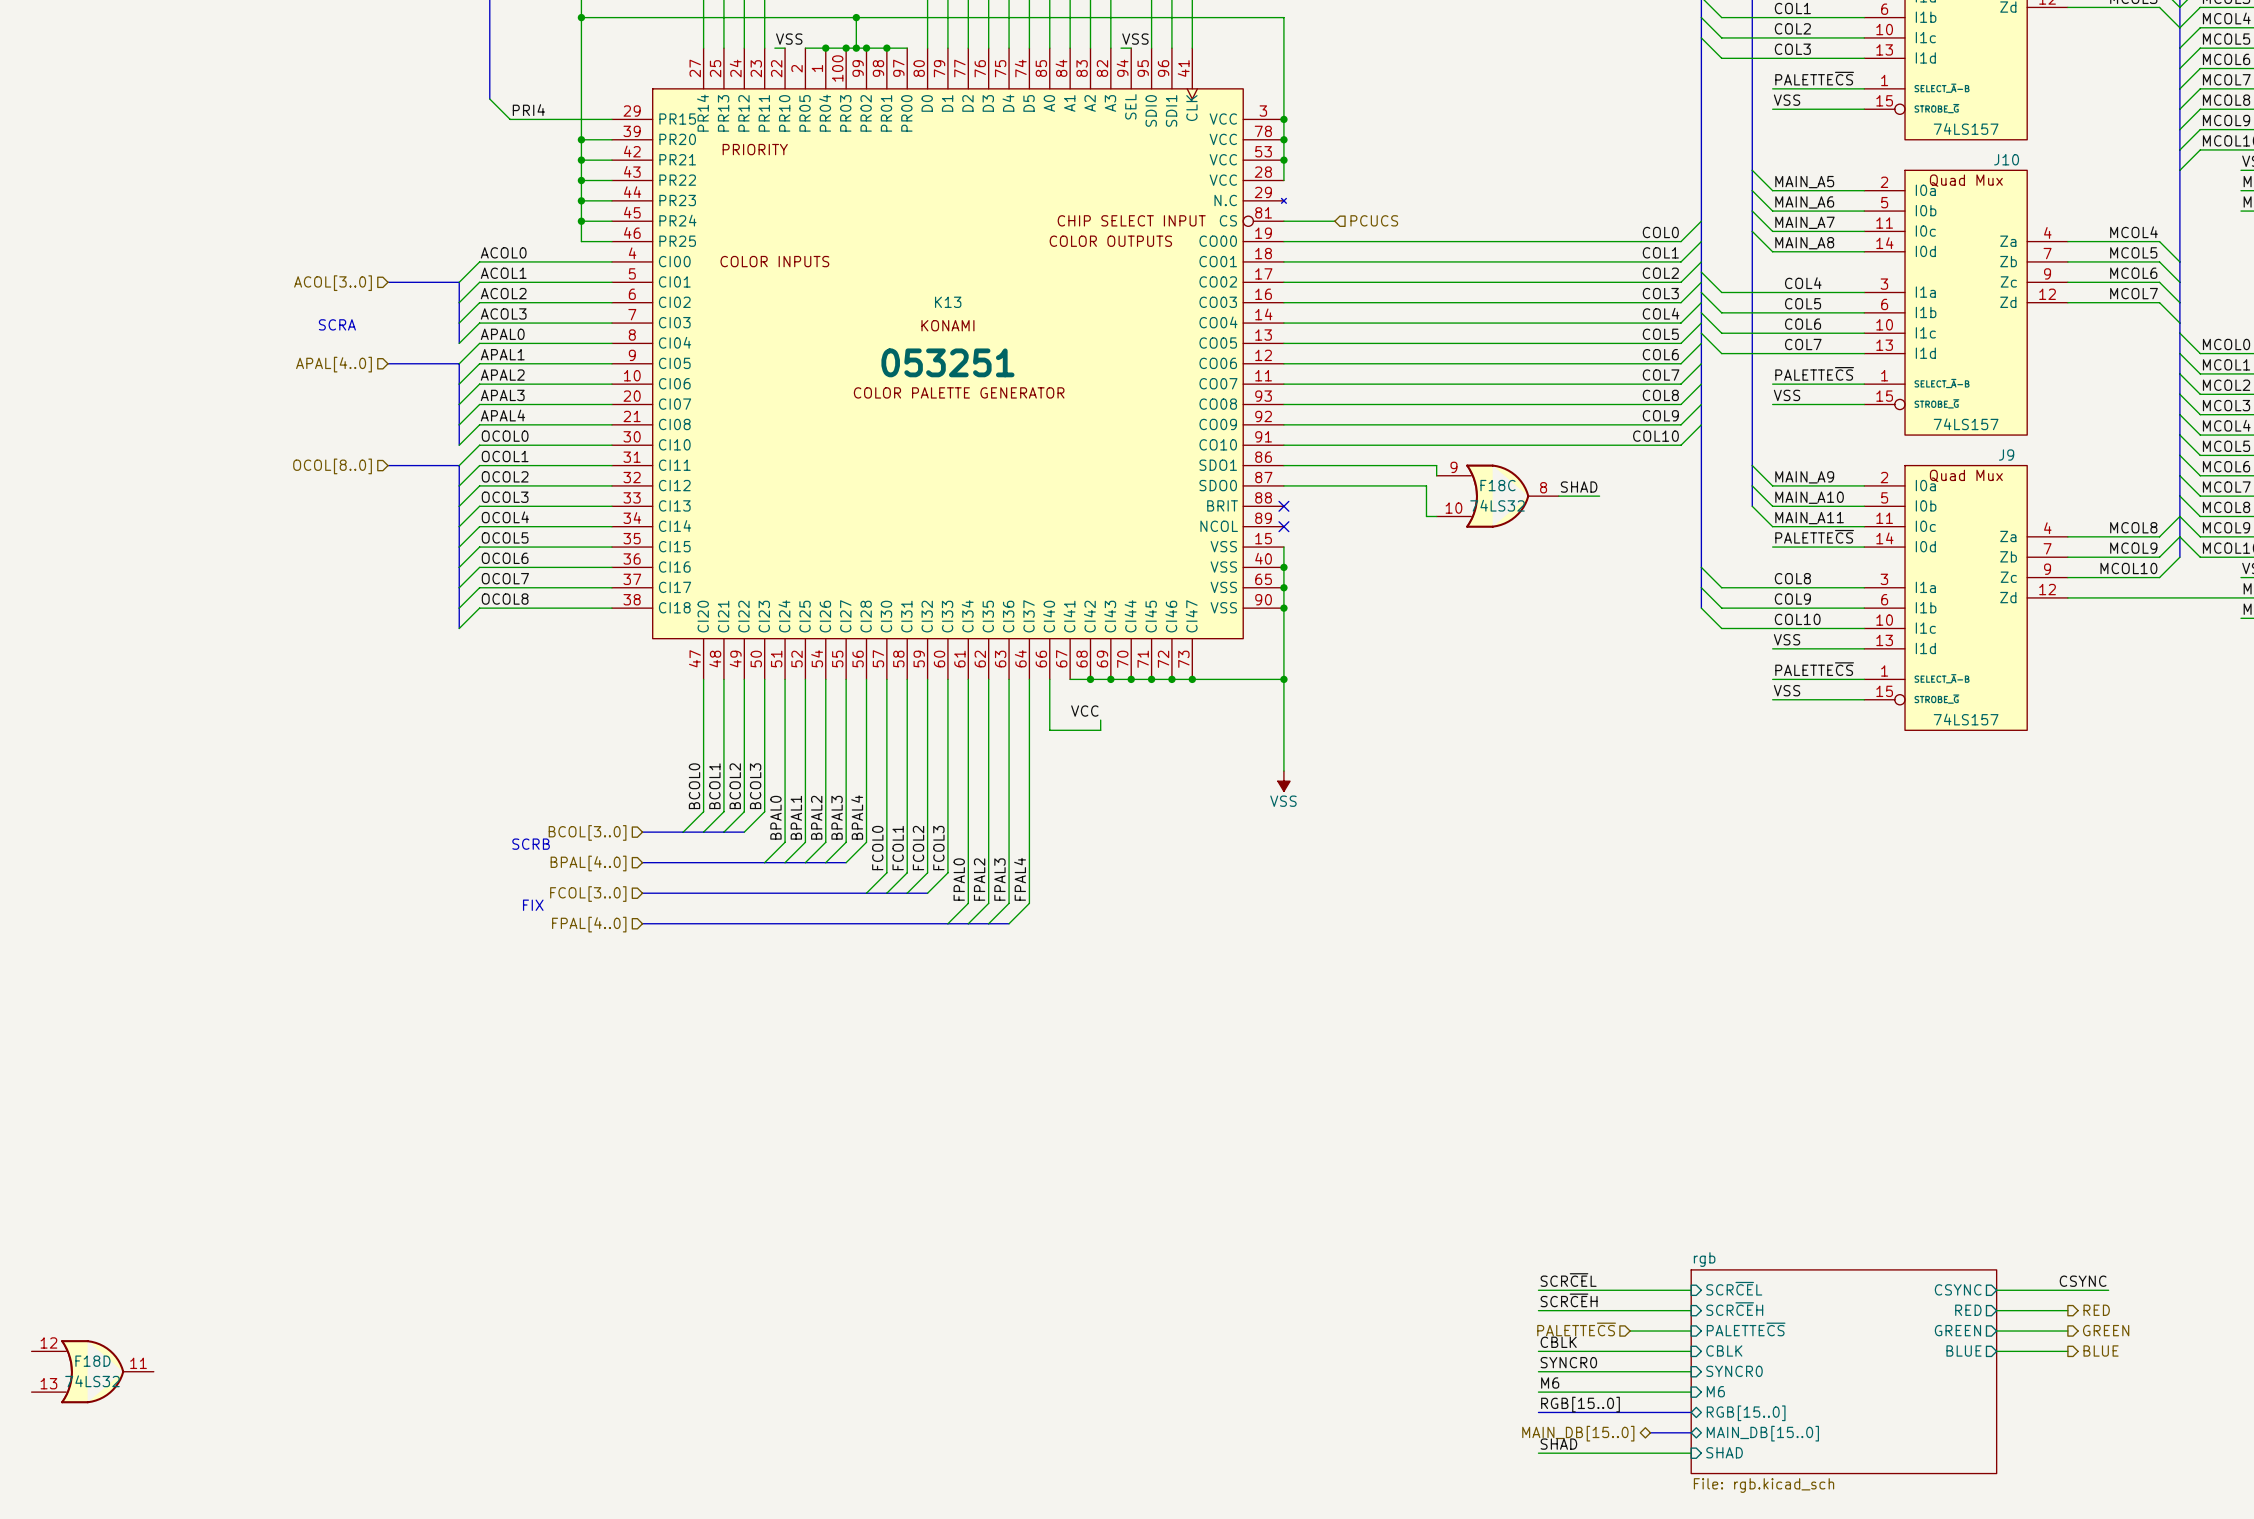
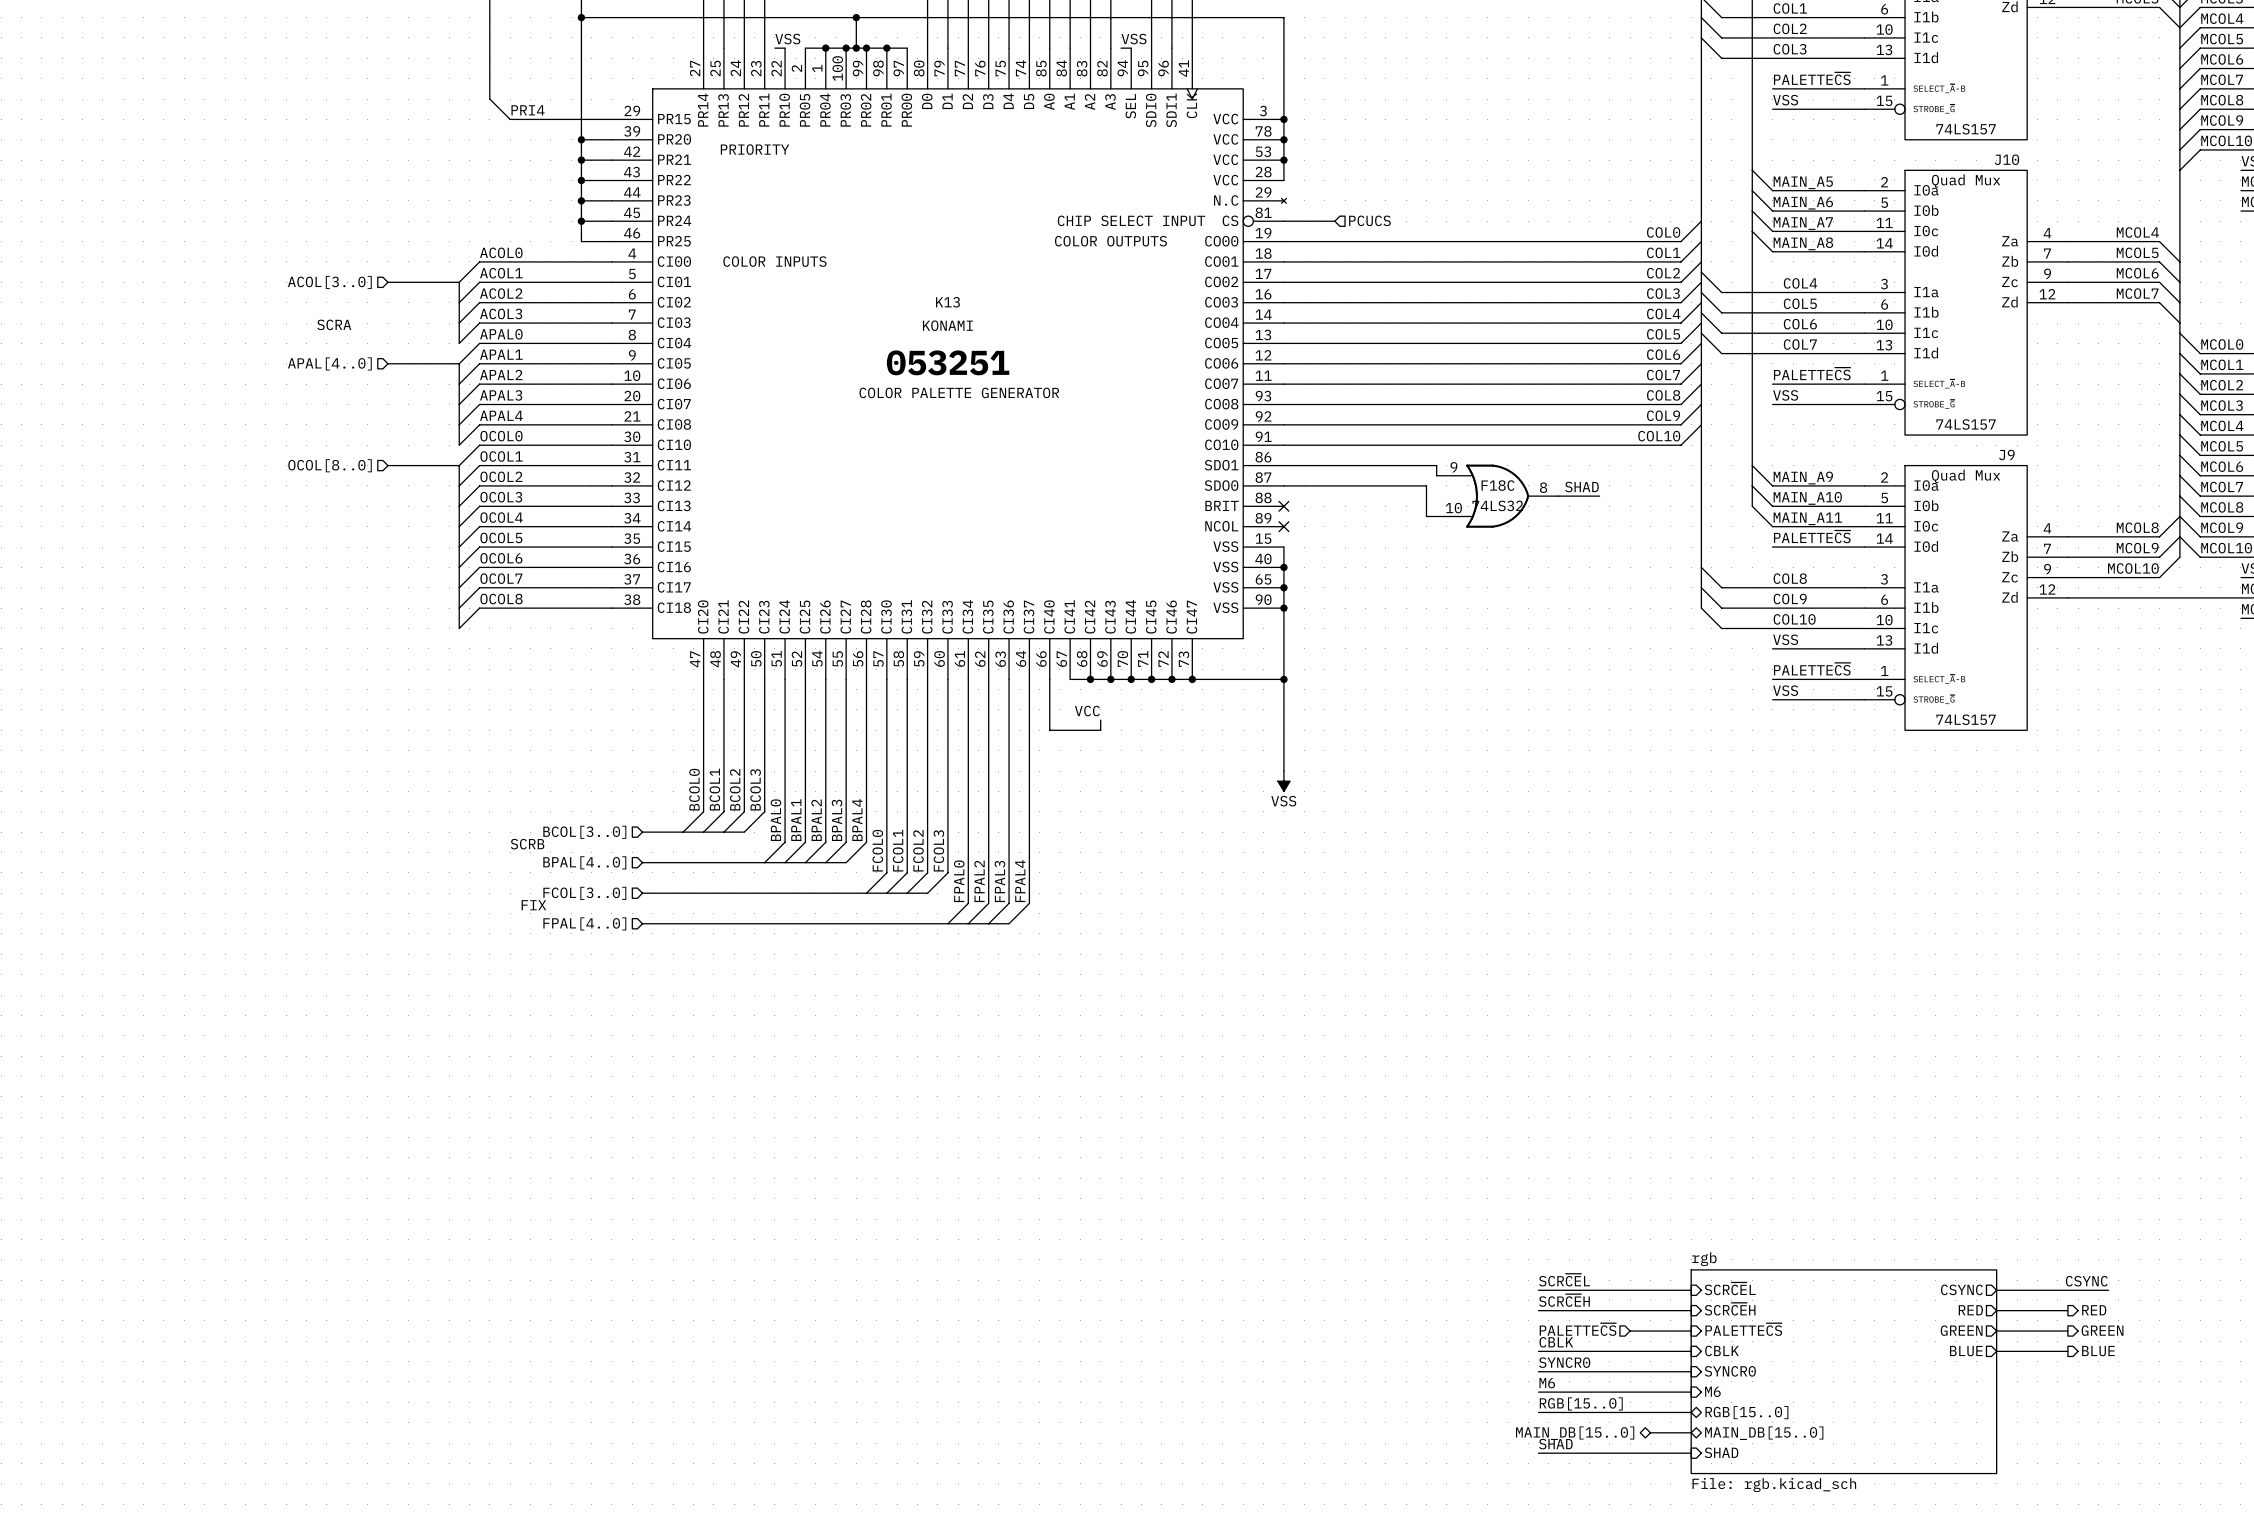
F18D: 74LS32 (92, 1371) -> none

